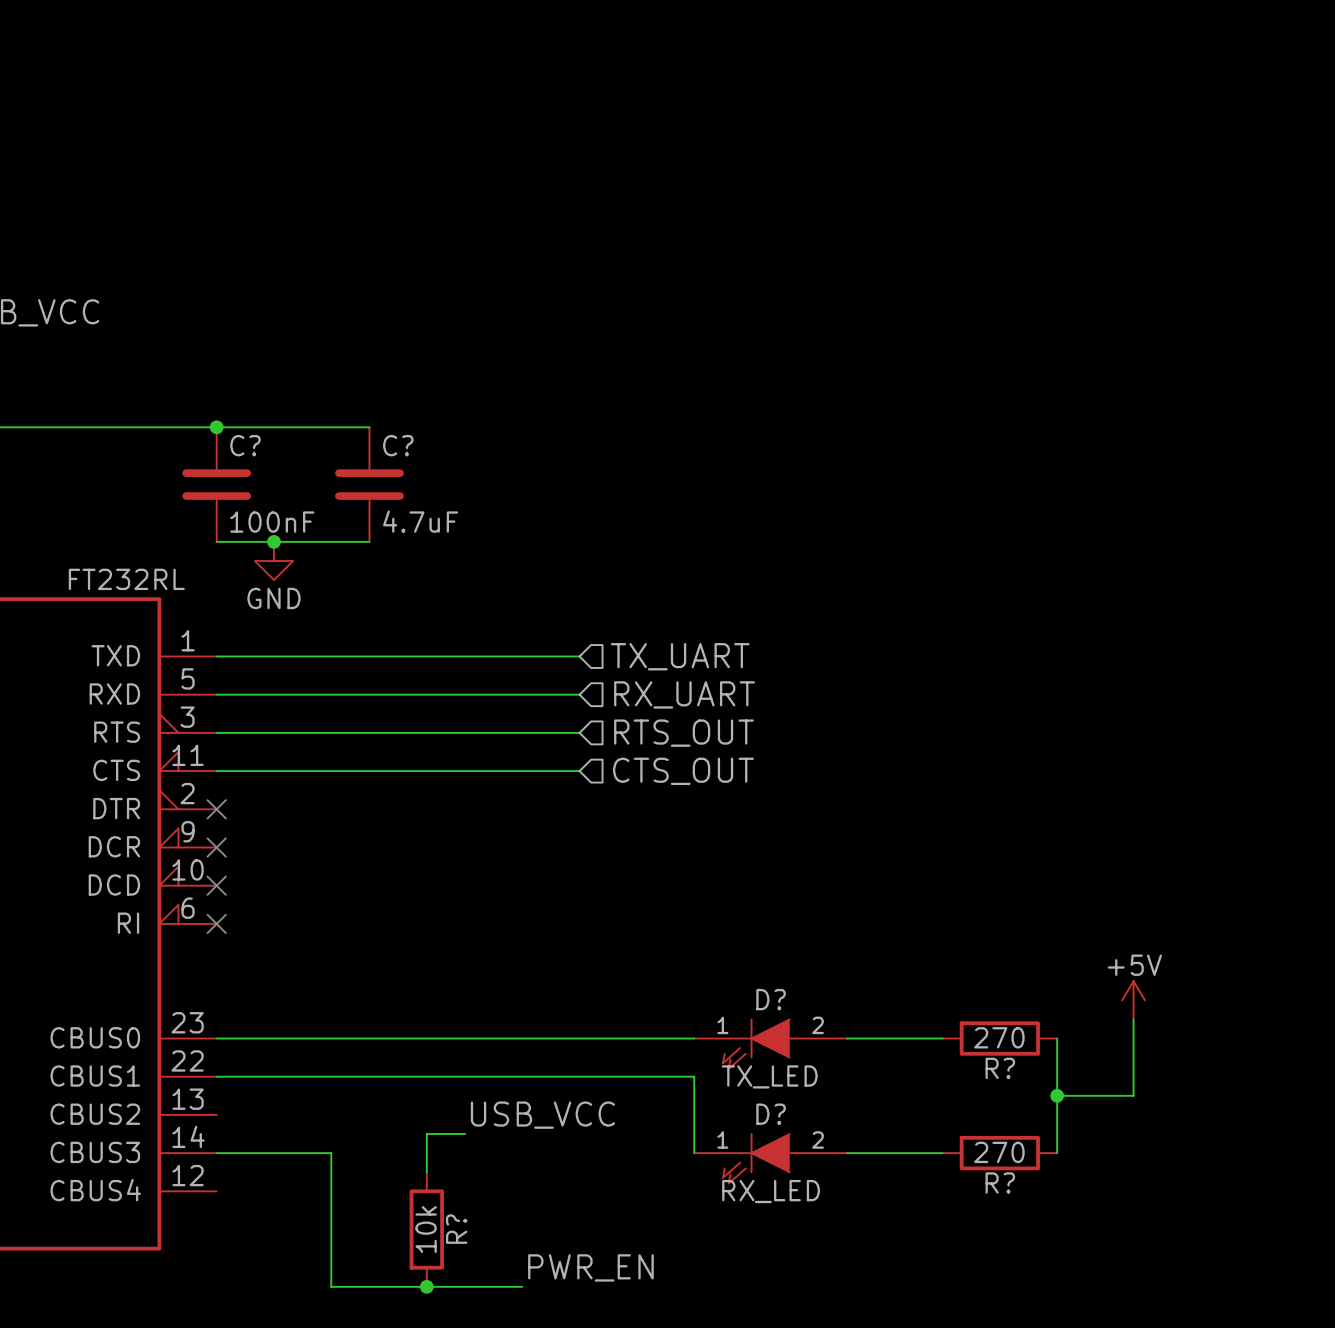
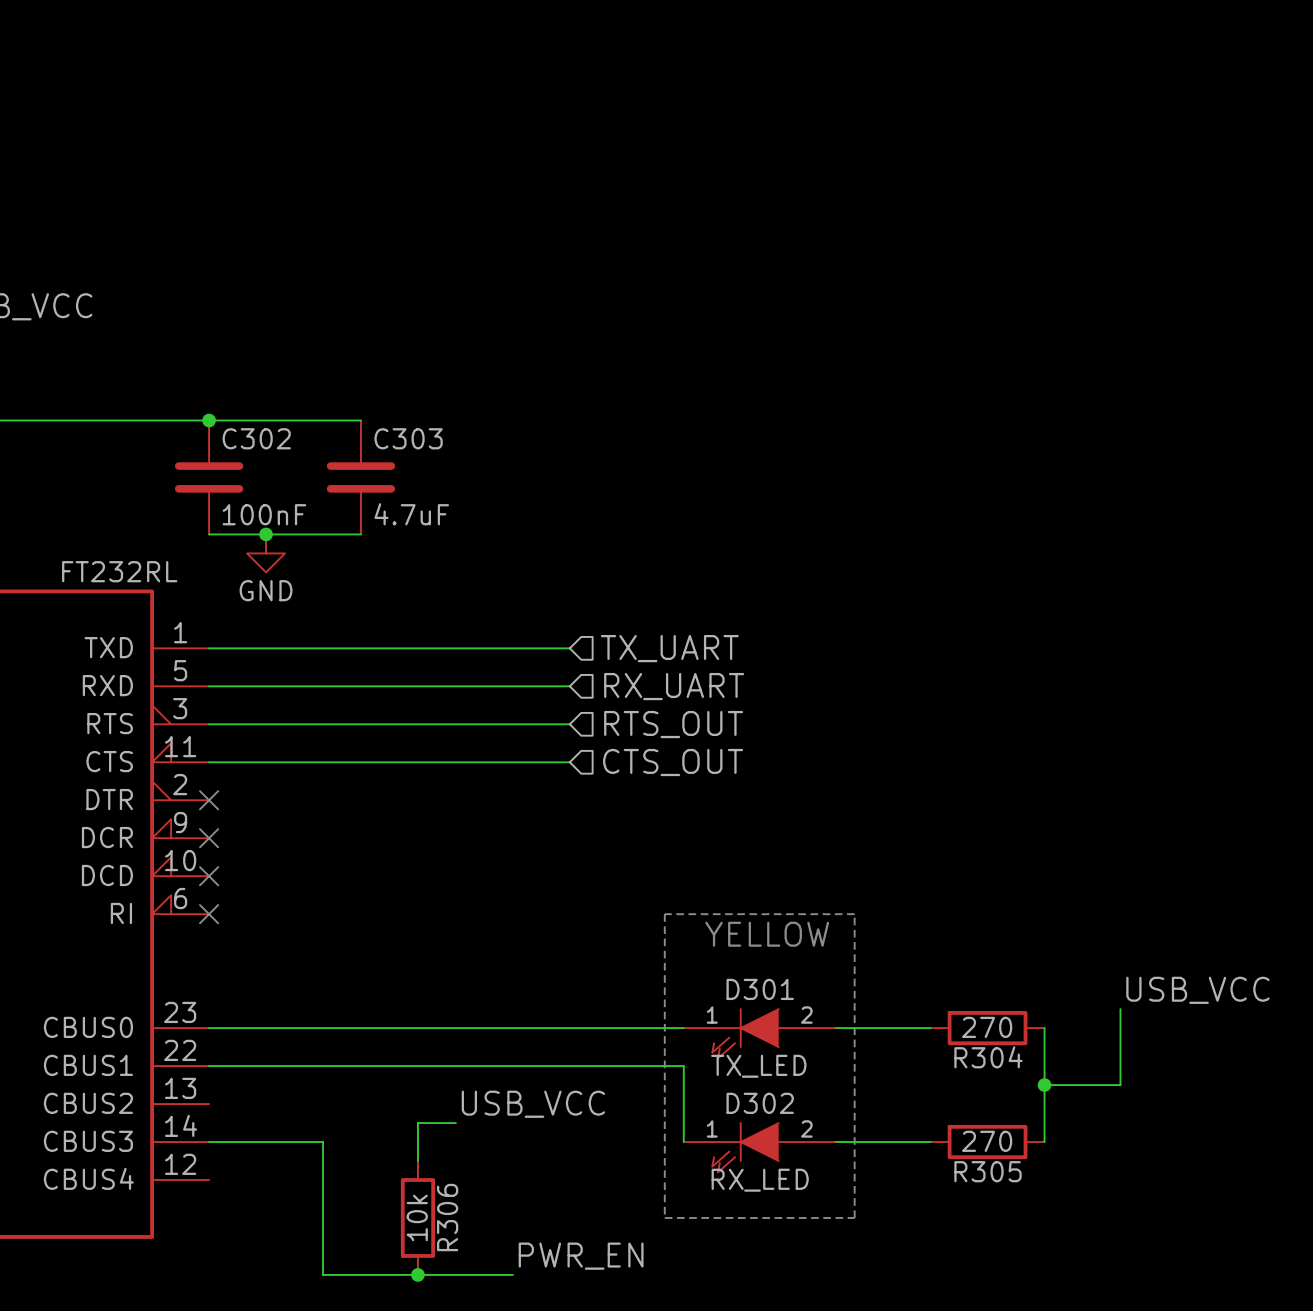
C? name: C? (245, 445) -> C302 (256, 438)
C? name: C? (398, 445) -> C303 (408, 438)
line: none -> (664, 914) (664, 1217) (854, 1217) (854, 914) (664, 914)
text: none -> YELLOW (767, 934)
D? name: D? (771, 999) -> D301 (760, 989)
power symbol: +5V (1133, 1000) -> none
label: none -> USB_VCC (1197, 990)
R? name: R? (1000, 1068) -> R304 (988, 1057)
D? name: D? (771, 1114) -> D302 (760, 1103)
R? name: R? (1000, 1182) -> R305 (988, 1171)
R? name: R? (456, 1229) -> R306 (447, 1217)

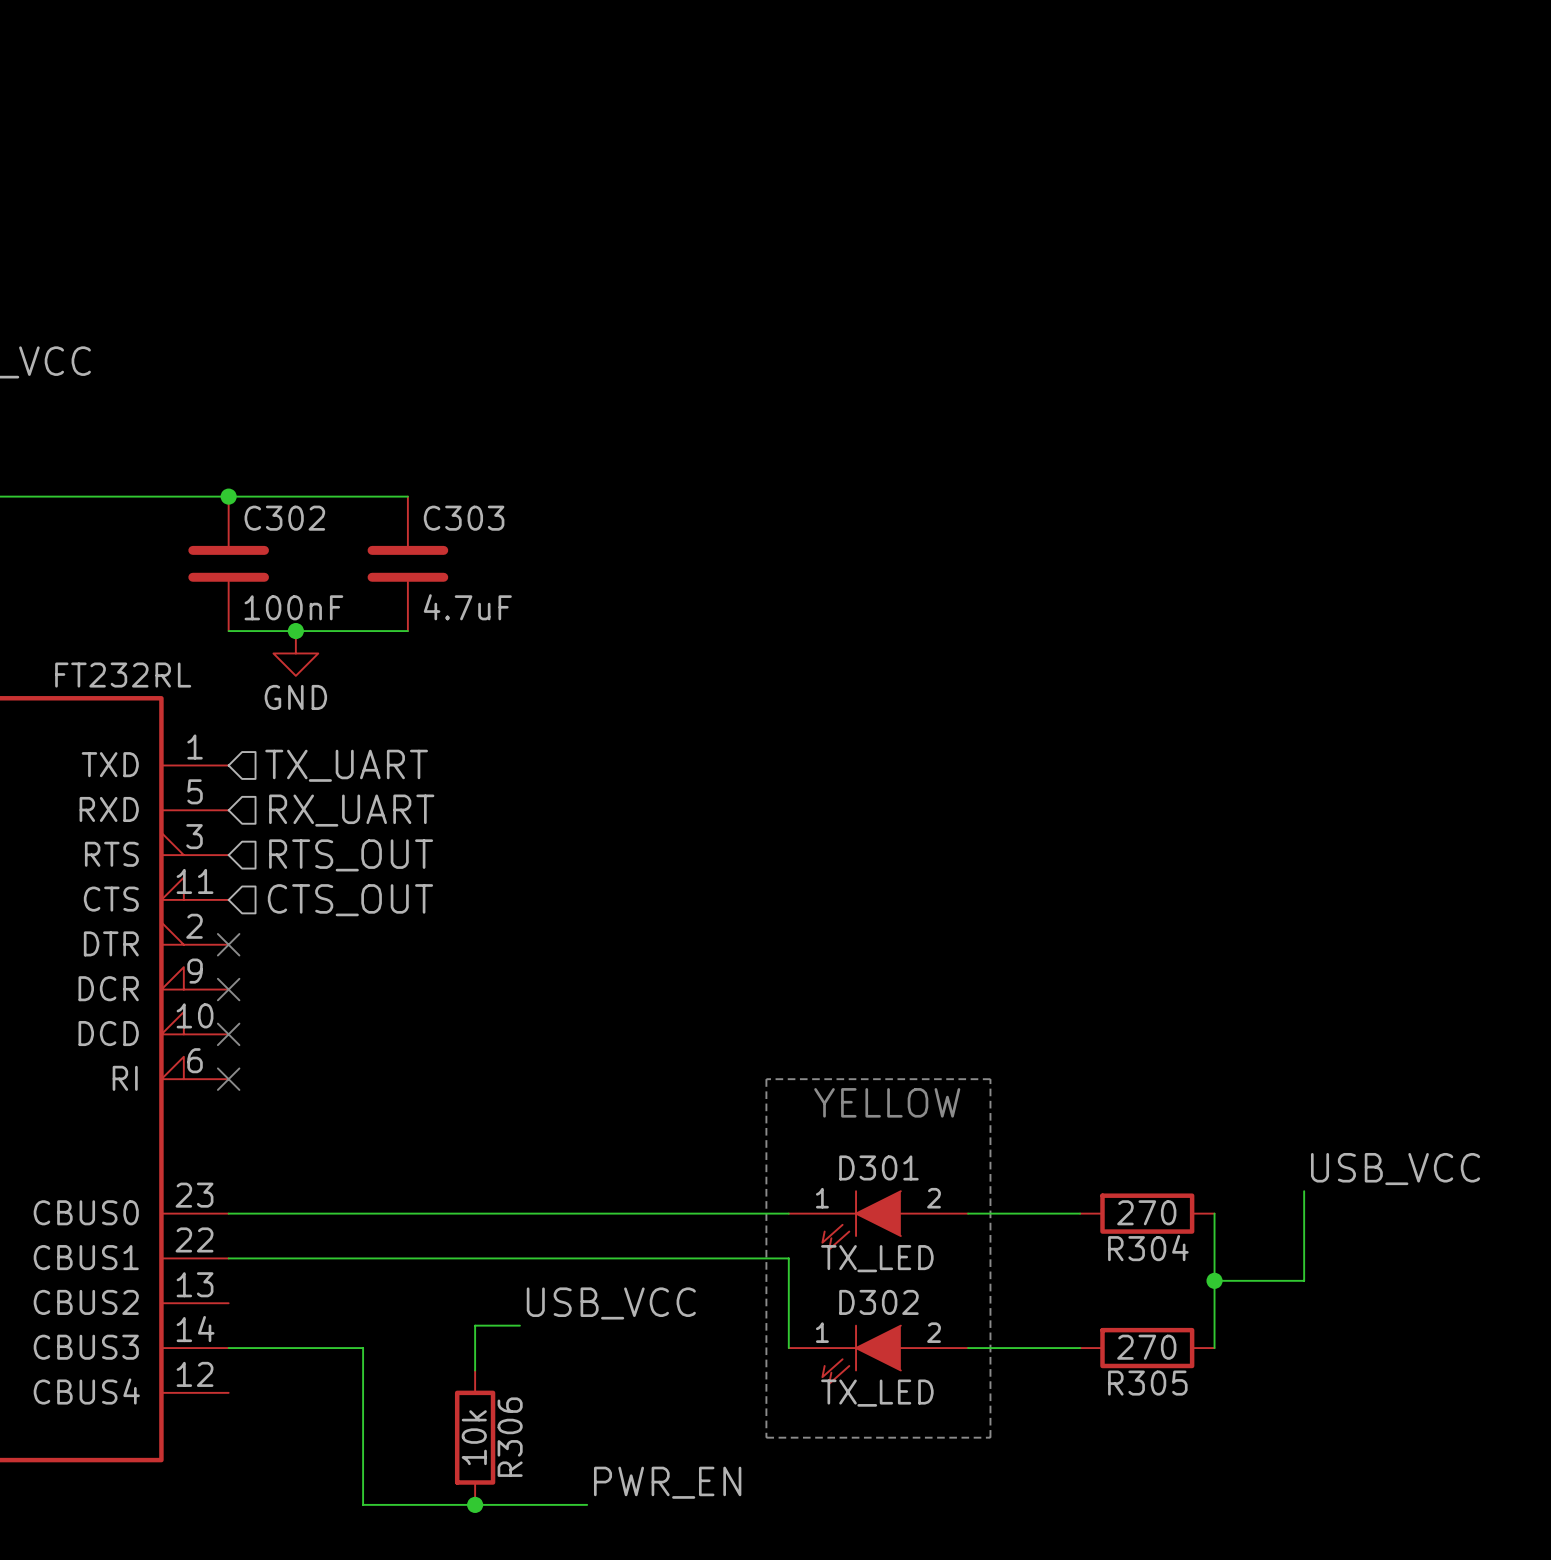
wire: (209, 648) (569, 648) -> none
hierarchical label position: TX_UART (669, 648) -> TX_UART (346, 765)
wire: (209, 686) (569, 686) -> none
hierarchical label position: RX_UART (674, 686) -> RX_UART (351, 810)
wire: (209, 724) (569, 724) -> none
hierarchical label position: RTS_OUT (673, 724) -> RTS_OUT (351, 855)
wire: (209, 762) (569, 762) -> none
hierarchical label position: CTS_OUT (673, 762) -> CTS_OUT (350, 900)
D302 value: RX_LED (760, 1180) -> TX_LED (877, 1393)

